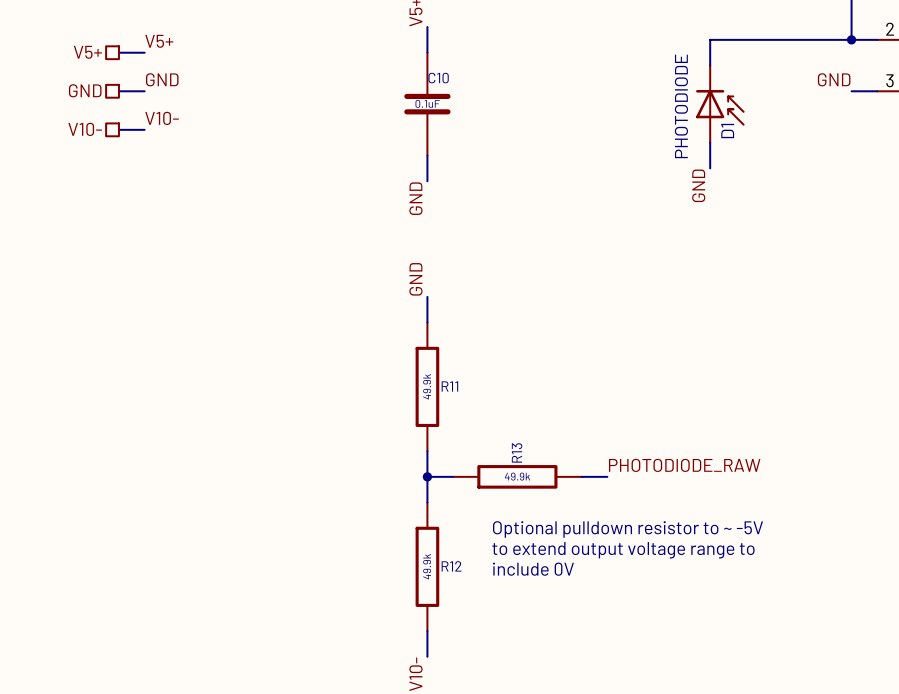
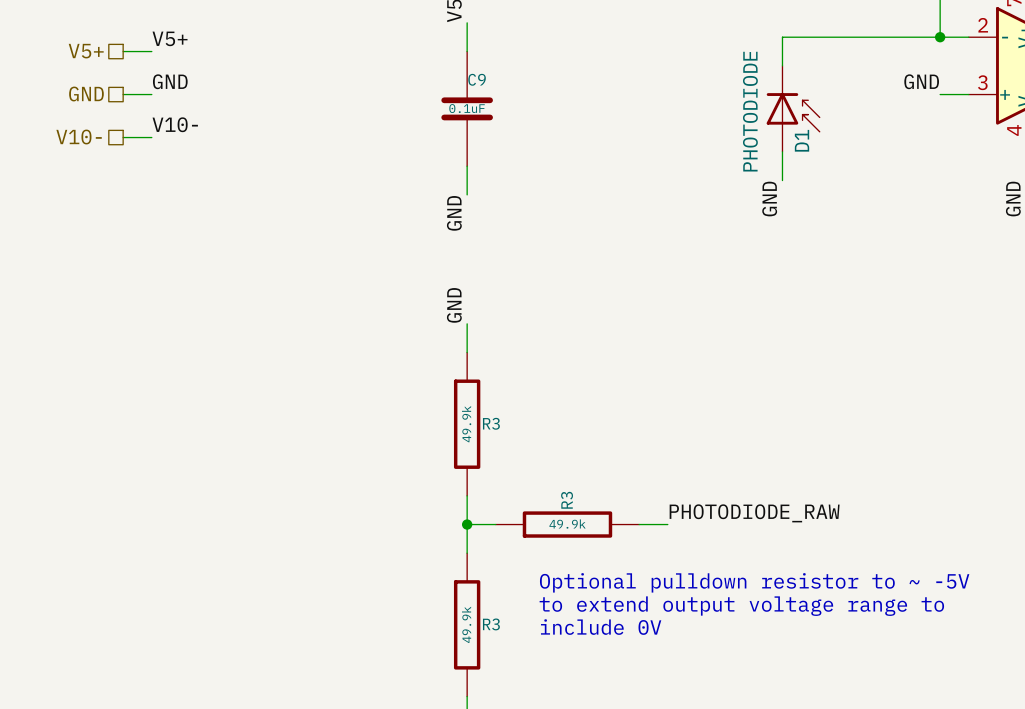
C10 name: C10 (438, 78) -> C9 (477, 79)
R11 name: R11 (449, 386) -> R3 (491, 423)
R13 name: R13 (517, 452) -> R3 (567, 500)
R12 name: R12 (451, 566) -> R3 (491, 624)

